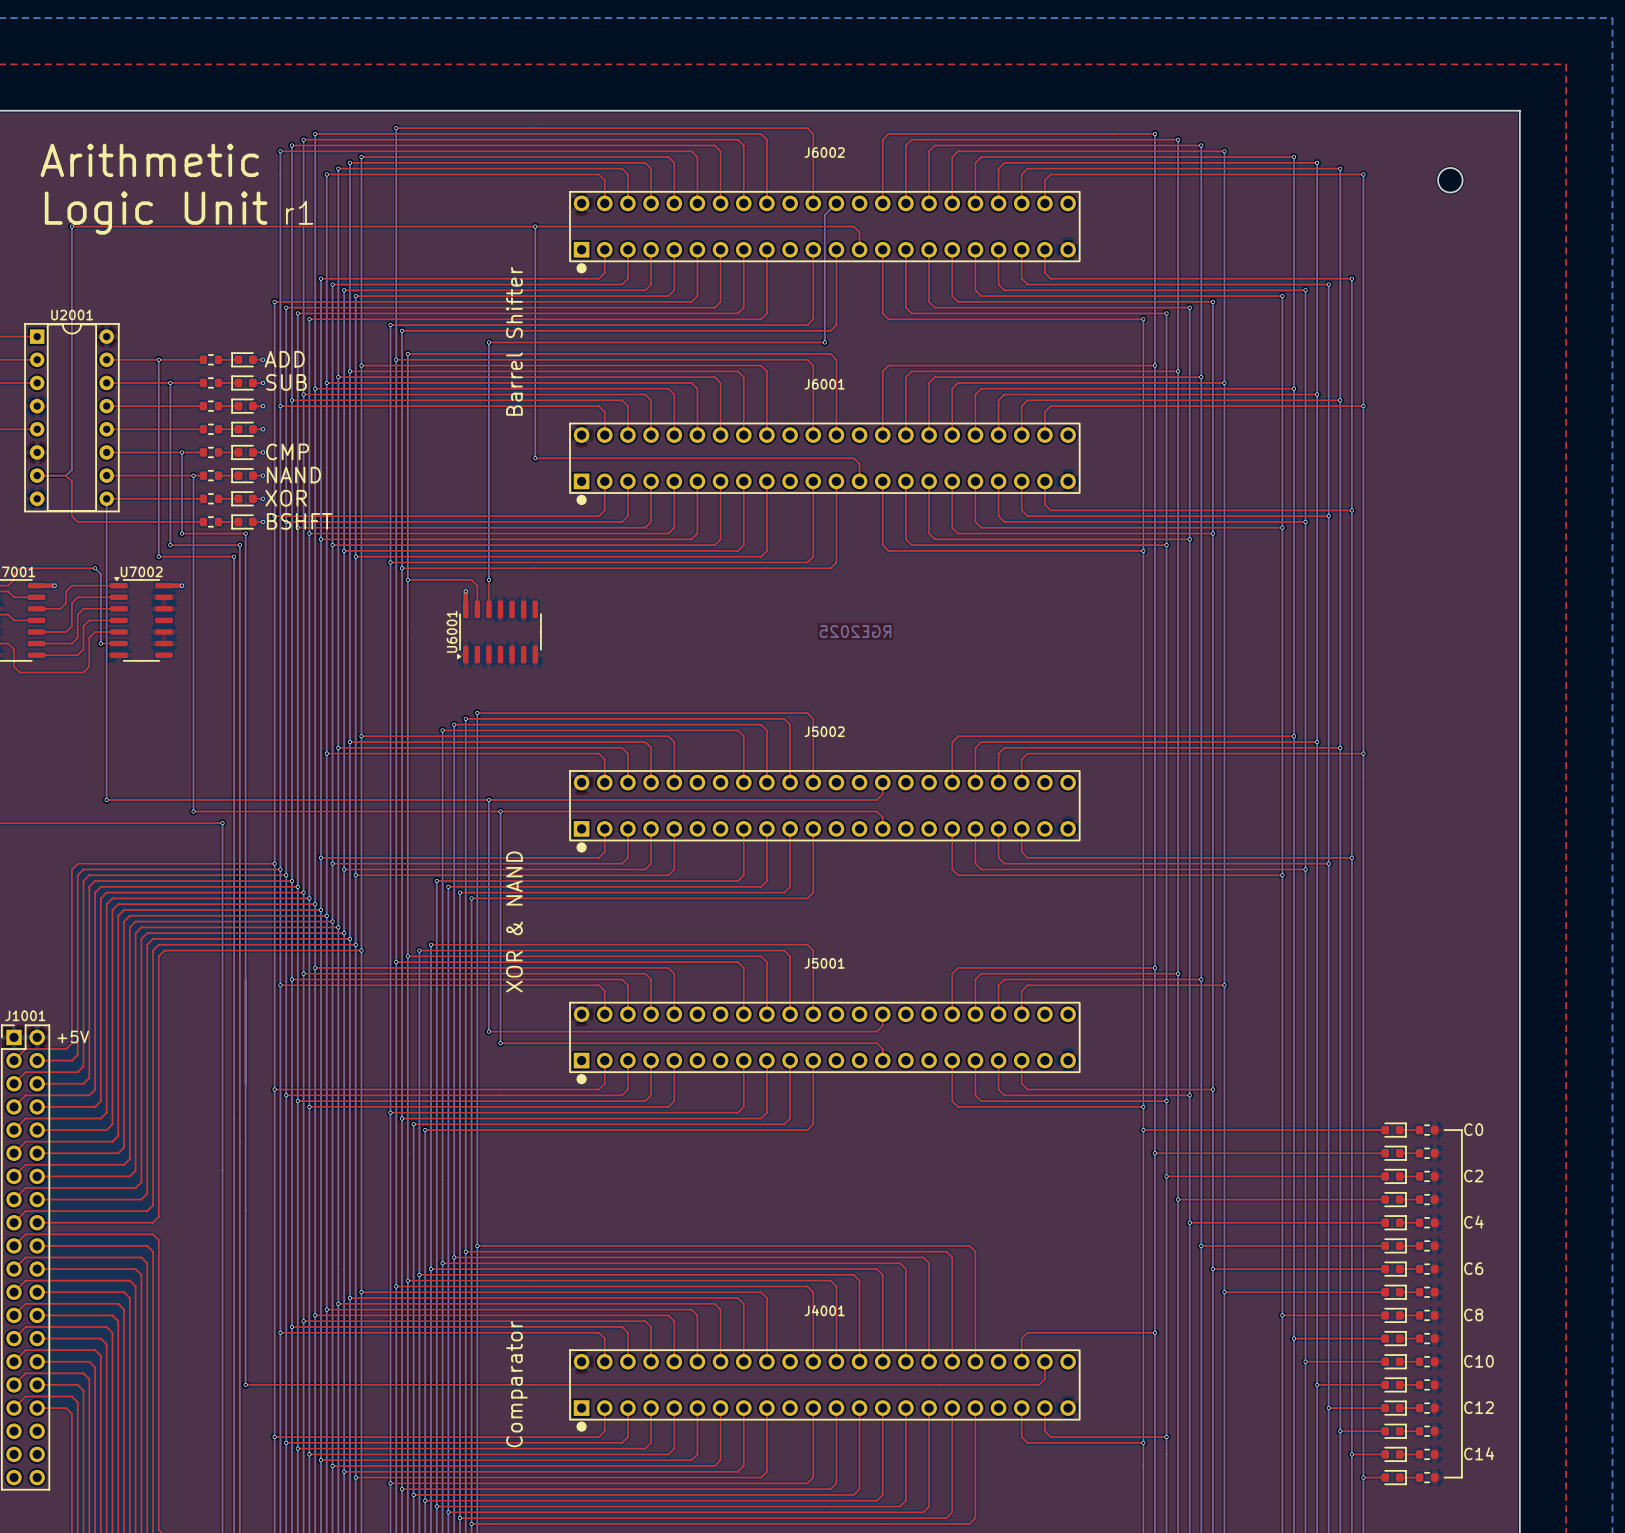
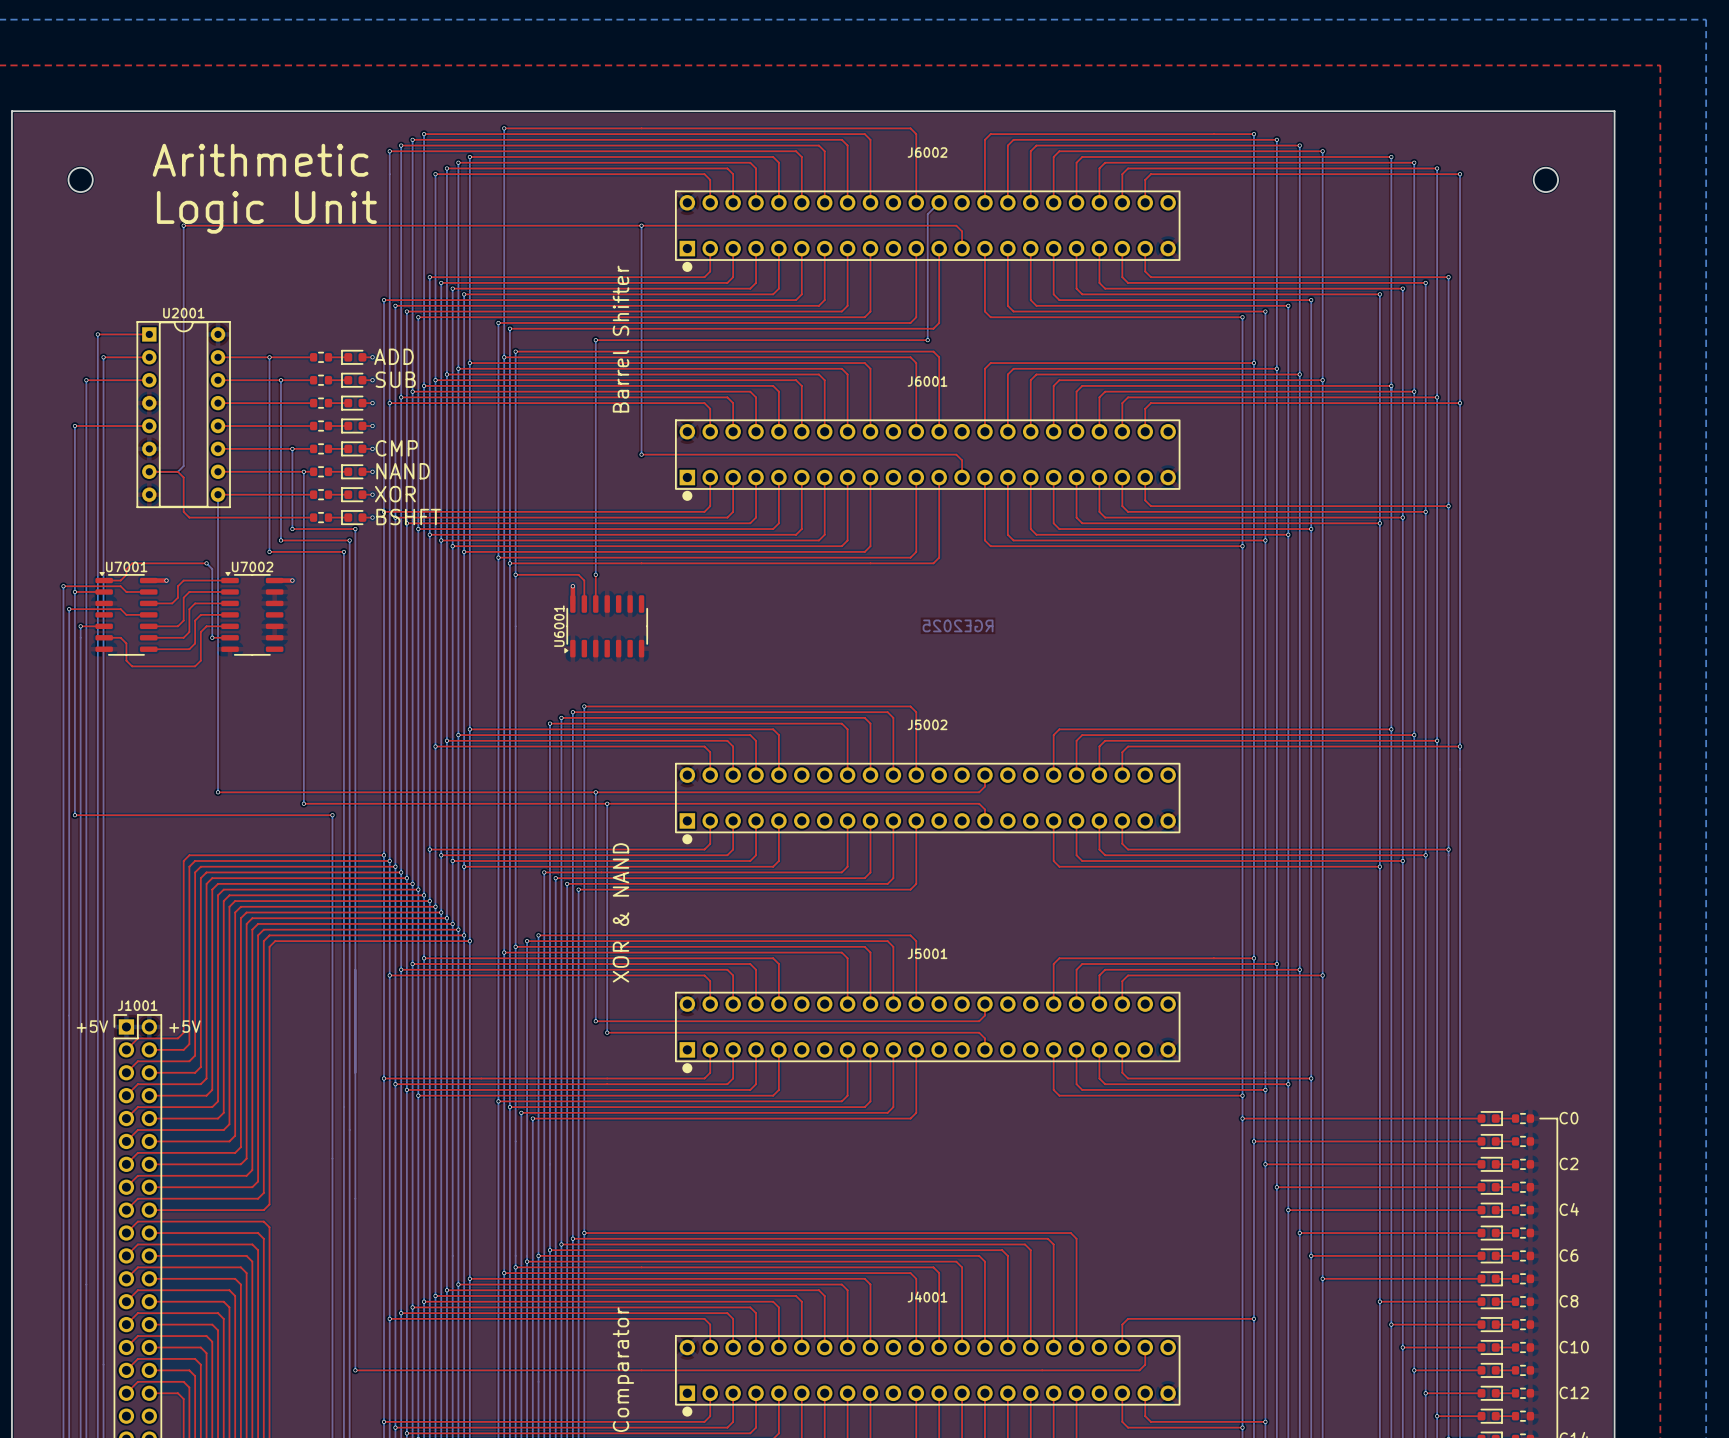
text: r1 (299, 212) -> none

